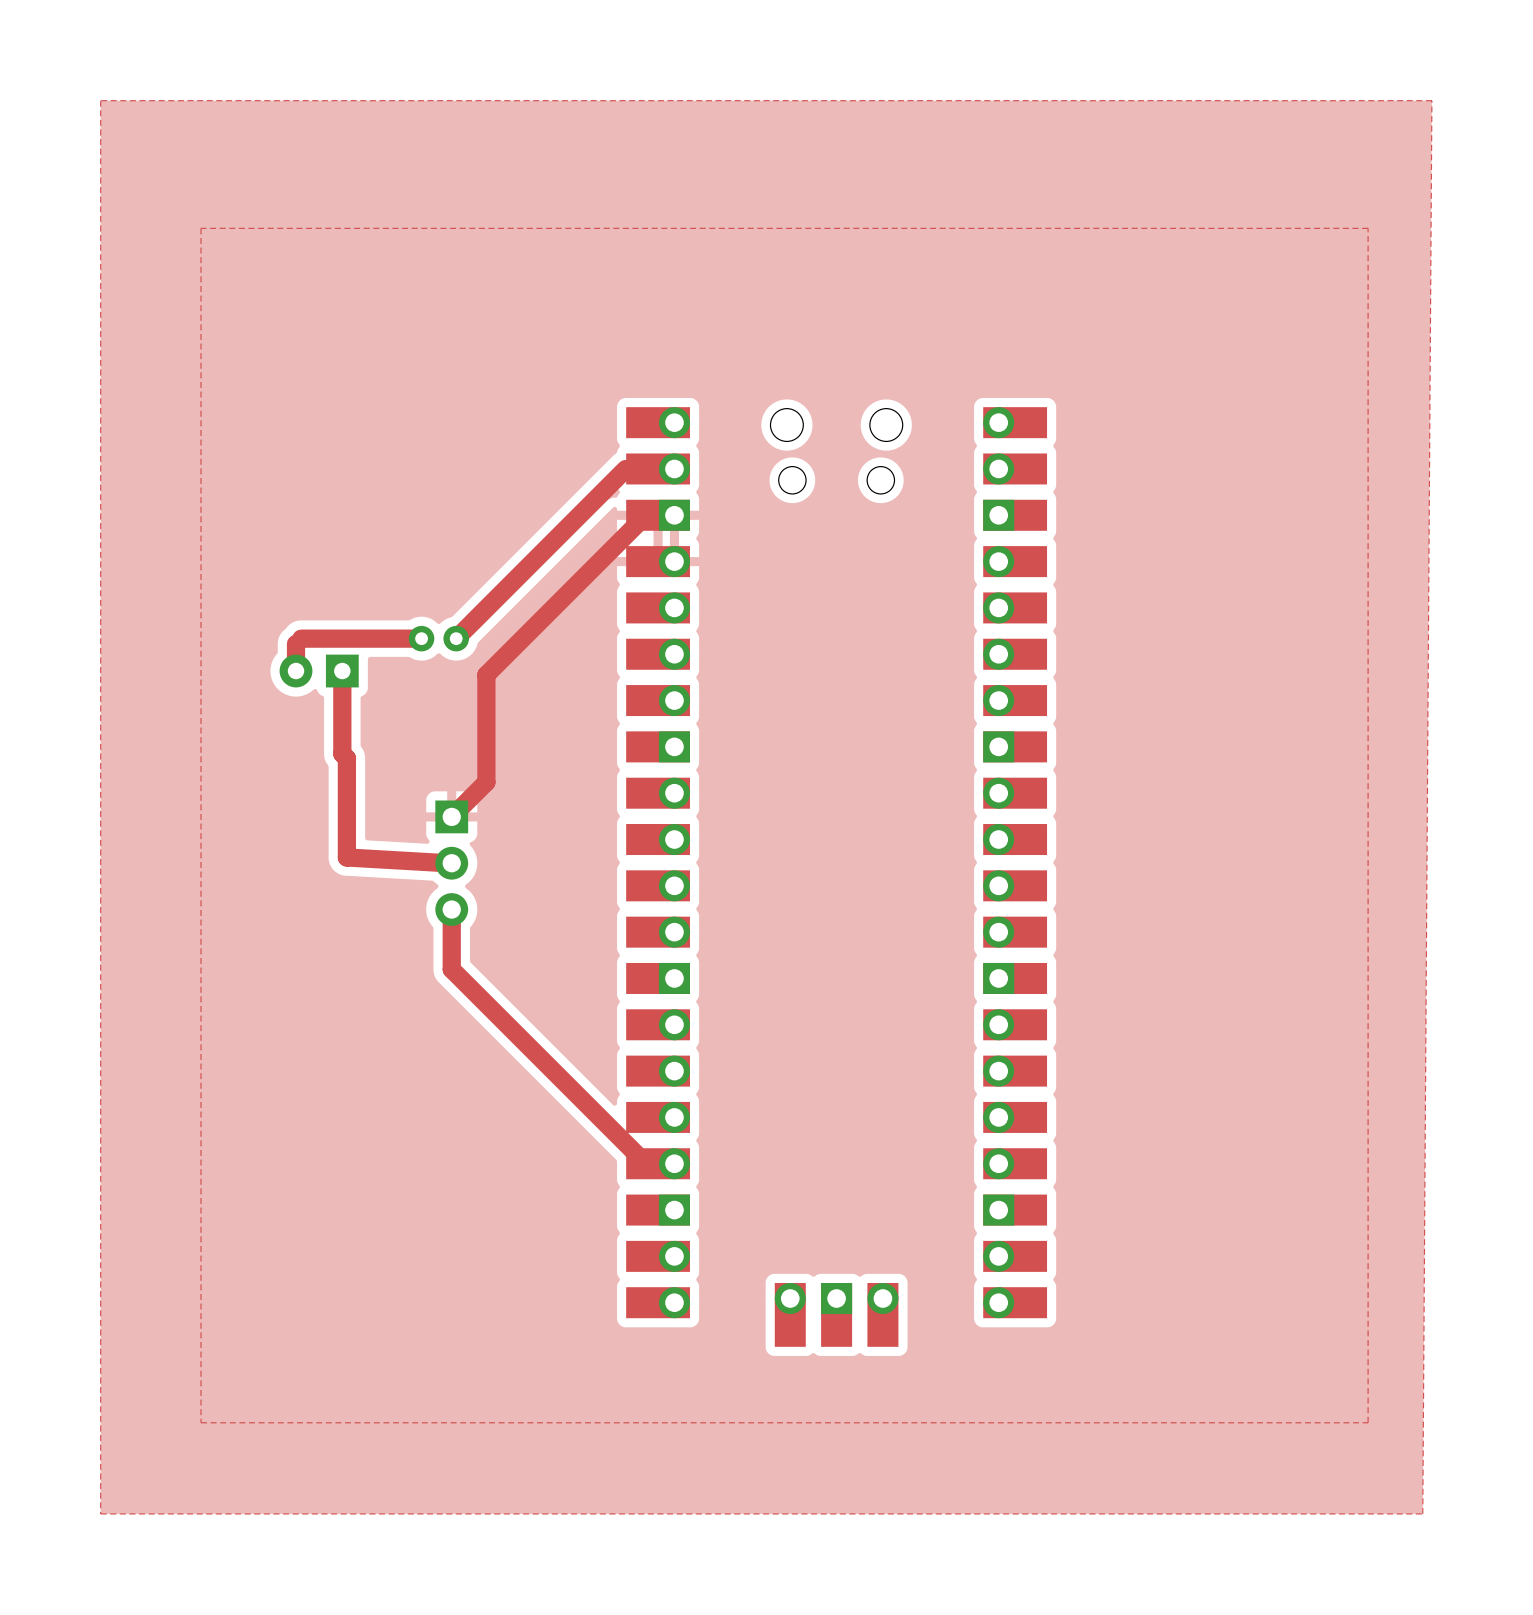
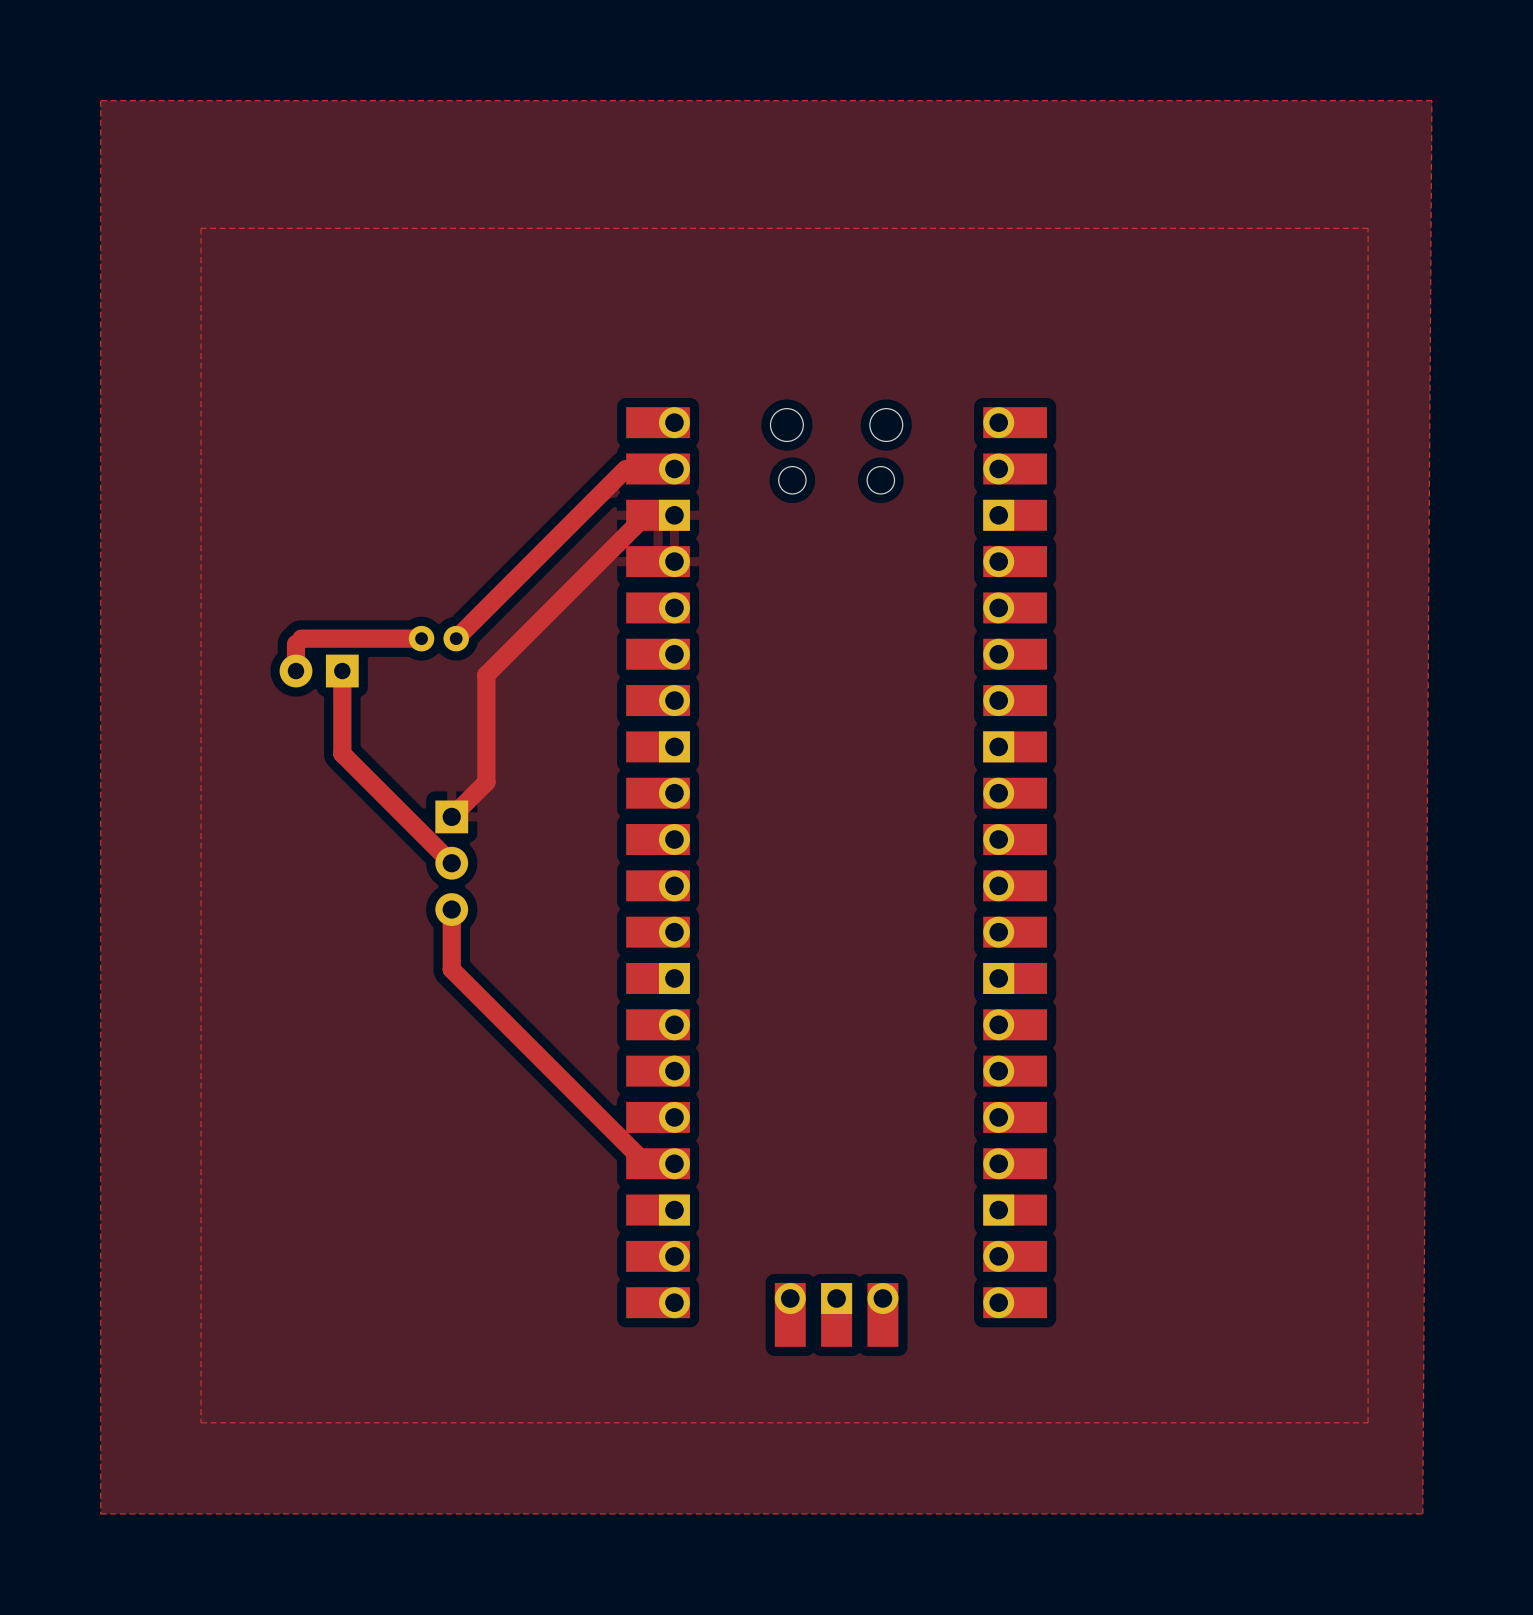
top track: (346, 758) (346, 857) (447, 863) -> (346, 758) (451, 863)

